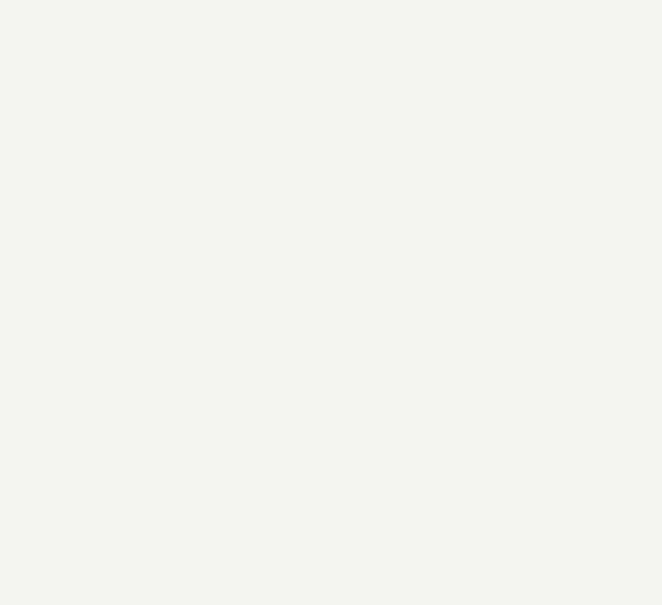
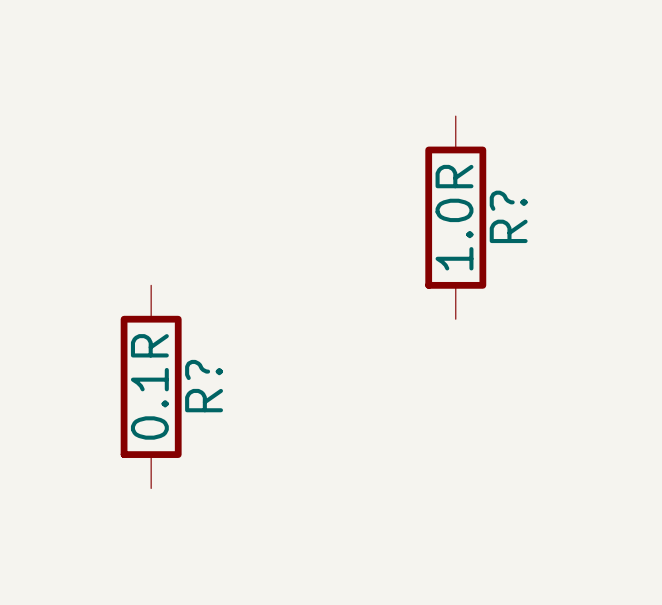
R?: none -> 1.0R (455, 217)
R?: none -> 0.1R (151, 386)

